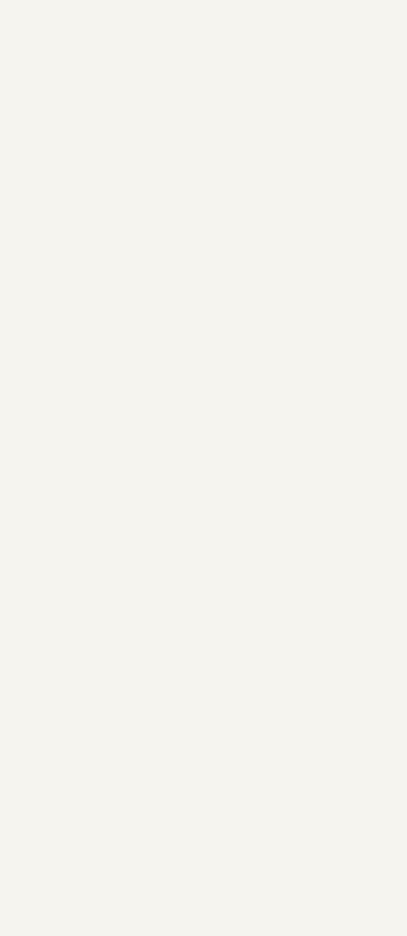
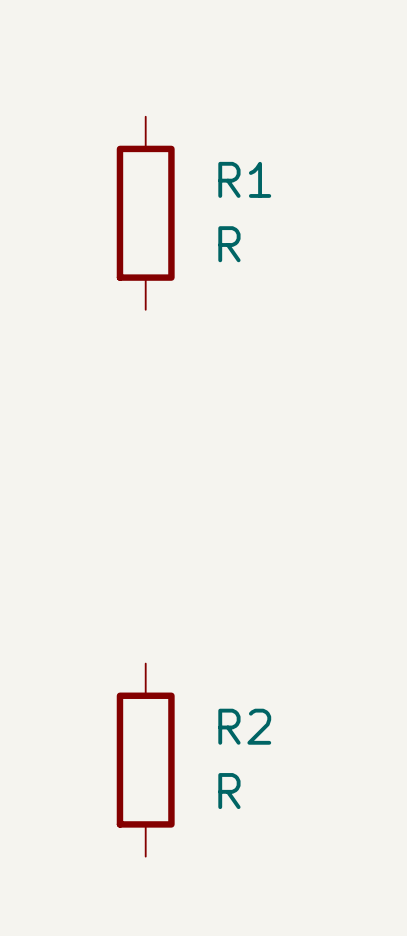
R1: none -> R (145, 213)
R2: none -> R (145, 760)

